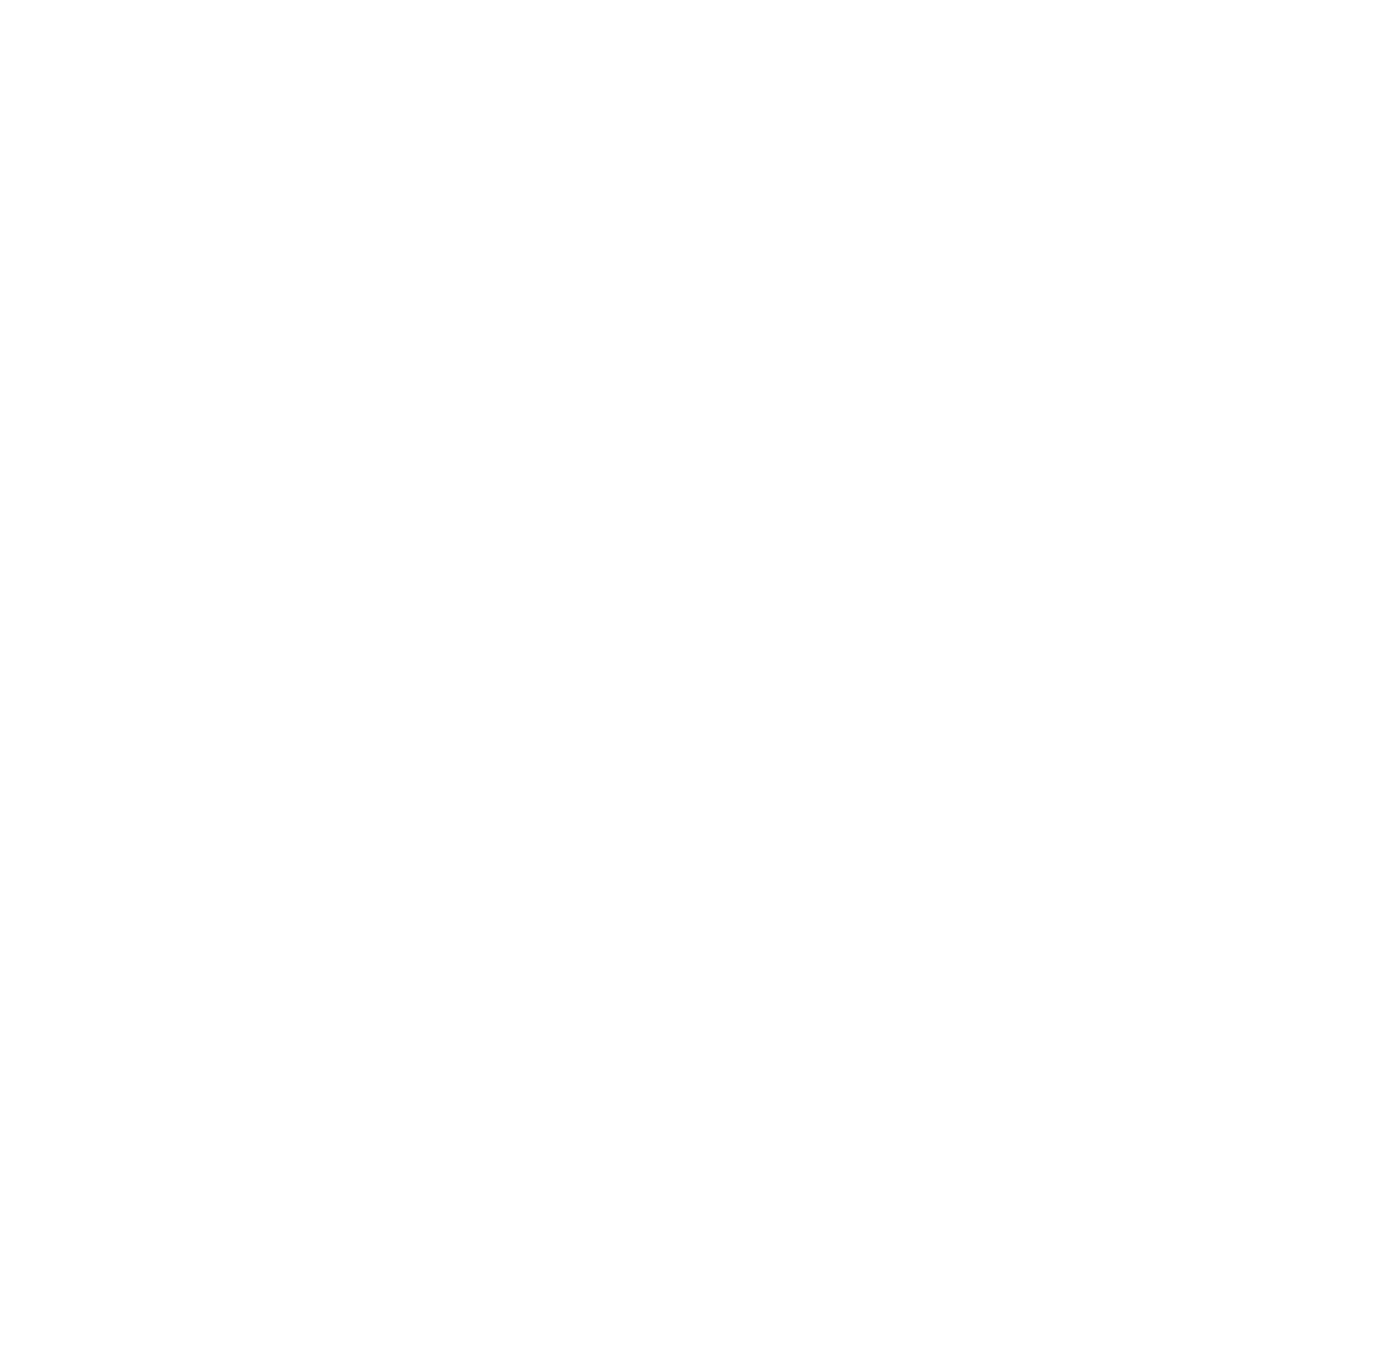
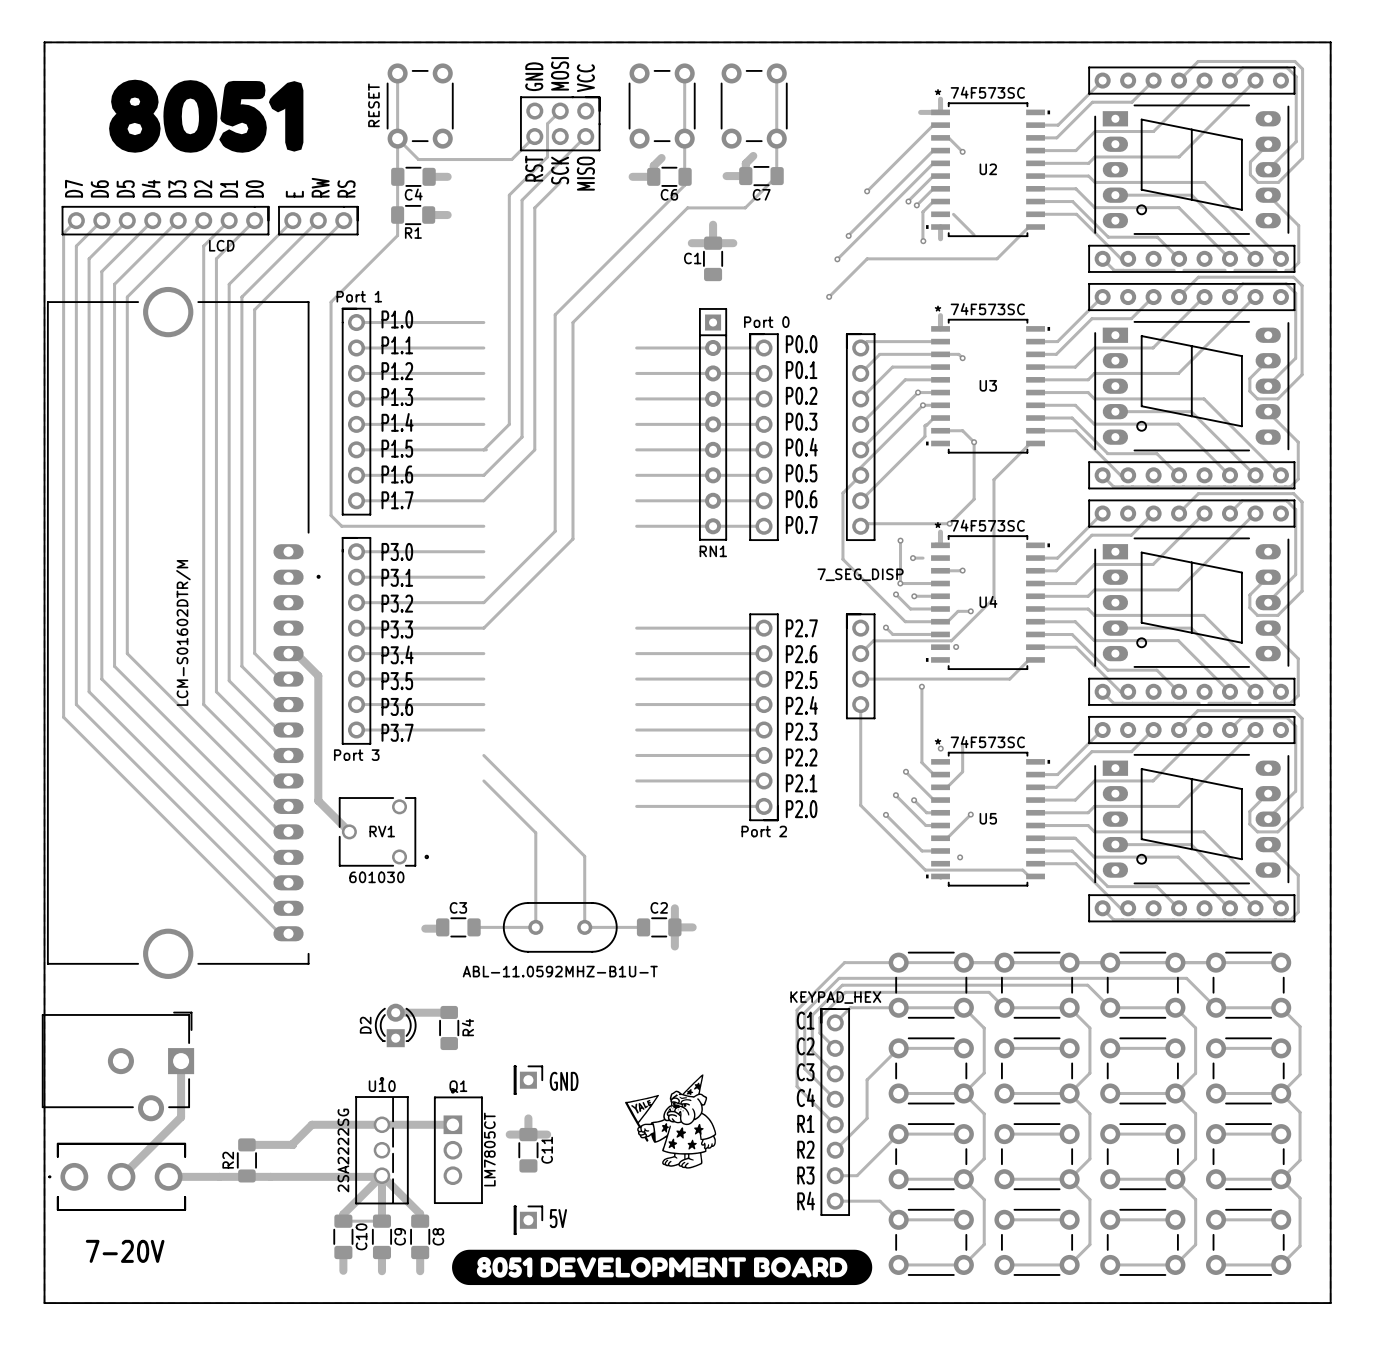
board edge: none -> (44, 42) (1330, 42) (1330, 1303) (44, 1303) (44, 42)
track: none -> (397, 73) (397, 235) (331, 302) (331, 515) (341, 526) (483, 526)
text: none -> MOSI (560, 73)
track: none -> (684, 73) (685, 184) (555, 314) (555, 531) (483, 602) (356, 602)
track: none -> (776, 73) (777, 176) (745, 207) (687, 207) (572, 322) (572, 539) (483, 628) (356, 628)
text: none -> GND (534, 76)
text: none -> VCC (585, 78)
drawing: none -> [109, 79, 304, 153]
track: none -> (1102, 80) (1058, 125) (1035, 125)
track: none -> (1153, 80) (1131, 102) (1092, 102) (1056, 137) (1035, 137)
track: none -> (1179, 80) (1198, 61) (1294, 61) (1302, 69) (1302, 158) (1278, 182) (1258, 182) (1250, 174) (1250, 162) (1268, 144)
part: none -> (1191, 80)
track: none -> (1204, 80) (1153, 131) (1095, 131) (1075, 150) (1035, 150)
track: none -> (1230, 80) (1242, 67) (1287, 67) (1296, 76) (1296, 141) (1268, 169)
track: none -> (1255, 80) (1179, 156) (1095, 156) (1088, 163) (1035, 163)
text: none -> 74F573SC (987, 92)
track: none -> (940, 99) (940, 112) (920, 112)
text: none -> RESET (373, 105)
part: none -> (420, 106)
part: none -> (662, 106)
part: none -> (754, 106)
track: none -> (560, 111) (547, 123) (547, 156) (509, 195) (509, 424) (483, 449)
part: none -> (560, 123)
track: none -> (940, 125) (933, 125) (867, 191)
track: none -> (534, 136) (511, 159) (418, 159) (397, 138)
track: none -> (585, 136) (522, 200) (522, 437) (483, 475) (356, 475)
track: none -> (940, 137) (948, 137) (962, 151)
track: none -> (940, 150) (933, 150) (848, 235)
via: none -> (962, 151)
track: none -> (753, 155) (745, 163) (745, 176) (726, 176)
track: none -> (661, 157) (653, 165) (653, 176) (632, 176)
track: none -> (940, 163) (933, 163) (837, 259)
text: none -> RST (534, 168)
U2: none -> (988, 169)
part: none -> (1191, 169)
text: none -> SCK (560, 170)
text: none -> MISO (585, 173)
C4: none -> (413, 176)
track: none -> (447, 176) (429, 176) (429, 181)
C6: none -> (669, 176)
C7: none -> (761, 176)
track: none -> (940, 176) (933, 176) (908, 201)
track: none -> (1035, 176) (1088, 176) (1095, 182) (1204, 182) (1280, 258)
track: none -> (560, 182) (534, 207) (534, 449) (483, 500) (356, 500)
text: none -> RW (320, 187)
text: none -> D7 (74, 188)
text: none -> D6 (99, 188)
text: none -> D5 (125, 188)
text: none -> D4 (151, 188)
text: none -> D3 (177, 188)
text: none -> D2 (203, 188)
text: none -> D1 (229, 188)
text: none -> D0 (254, 188)
text: none -> RS (346, 188)
track: none -> (940, 188) (933, 188) (916, 205)
track: none -> (1035, 188) (1075, 188) (1094, 207) (1178, 207) (1230, 258)
via: none -> (867, 191)
text: none -> E (294, 194)
track: none -> (1115, 195) (1191, 195) (1255, 258)
track: none -> (1268, 195) (1298, 225) (1298, 262) (1291, 270) (1285, 270)
via: none -> (908, 201)
track: none -> (940, 201) (933, 201) (922, 211) (923, 241)
track: none -> (1035, 201) (1072, 201) (1108, 237) (1157, 237) (1179, 258)
via: none -> (916, 205)
track: none -> (953, 214) (974, 234)
track: none -> (1035, 214) (1076, 214) (1121, 258) (1128, 258)
R1: none -> (413, 215)
track: none -> (428, 215) (447, 215)
track: none -> (76, 220) (63, 233) (63, 717) (280, 933) (288, 933)
track: none -> (101, 220) (76, 246) (76, 704) (280, 908) (288, 908)
track: none -> (127, 220) (89, 258) (89, 691) (280, 882) (288, 882)
track: none -> (152, 220) (101, 271) (101, 679) (280, 857) (288, 857)
part: none -> (165, 220)
track: none -> (178, 220) (114, 284) (114, 666) (280, 831) (288, 831)
track: none -> (203, 220) (127, 297) (127, 653) (280, 806) (288, 806)
track: none -> (229, 220) (203, 246) (203, 704) (280, 780) (288, 780)
track: none -> (254, 220) (216, 258) (216, 691) (280, 755) (288, 755)
track: none -> (292, 220) (229, 284) (229, 680) (278, 730) (288, 730)
track: none -> (318, 220) (241, 297) (241, 666) (280, 704) (288, 704)
part: none -> (318, 220)
track: none -> (343, 220) (254, 309) (254, 653) (280, 679) (288, 679)
track: none -> (713, 224) (713, 243)
track: none -> (940, 227) (940, 238)
track: none -> (1035, 227) (1028, 227) (997, 258) (867, 258) (829, 296)
via: none -> (848, 235)
via: none -> (923, 241)
track: none -> (691, 243) (733, 243)
text: none -> LCD (221, 245)
C1: none -> (713, 258)
track: none -> (1102, 258) (1114, 270) (1123, 270)
part: none -> (1191, 258)
via: none -> (837, 259)
track: none -> (1123, 270) (1132, 270)
track: none -> (1132, 270) (1148, 270)
track: none -> (1148, 270) (1158, 270)
track: none -> (1158, 270) (1174, 270)
track: none -> (1183, 270) (1199, 270)
track: none -> (1199, 270) (1209, 270)
track: none -> (1209, 270) (1225, 270)
track: none -> (1234, 270) (1250, 270)
track: none -> (1250, 270) (1260, 270)
track: none -> (1260, 270) (1276, 270)
track: none -> (1233, 292) (1242, 283) (1286, 283) (1295, 293) (1295, 358) (1267, 386)
text: none -> Port 1 (359, 296)
via: none -> (829, 296)
track: none -> (1178, 297) (1198, 277) (1293, 277) (1302, 285) (1302, 374) (1277, 398) (1257, 398) (1249, 391) (1249, 378) (1267, 360)
part: none -> (1191, 297)
track: none -> (1204, 297) (1153, 347) (1094, 347) (1075, 367) (1035, 367)
track: none -> (1098, 301) (1057, 341) (1035, 341)
track: none -> (1149, 301) (1131, 318) (1091, 318) (1056, 354) (1035, 354)
track: none -> (1251, 301) (1178, 373) (1094, 373) (1088, 379) (1035, 379)
text: none -> 74F573SC (987, 309)
track: none -> (940, 315) (940, 328)
text: none -> P1.0 (397, 319)
track: none -> (356, 322) (483, 322)
text: none -> Port 0 (766, 322)
track: none -> (940, 341) (867, 341) (860, 347)
text: none -> P0.0 (801, 344)
text: none -> P1.1 (397, 345)
track: none -> (356, 347) (483, 347)
track: none -> (636, 347) (764, 347)
track: none -> (962, 358) (958, 354) (879, 354) (860, 373)
via: none -> (962, 358)
track: none -> (940, 367) (892, 367) (860, 398)
text: none -> P0.1 (801, 370)
text: none -> P1.2 (397, 371)
track: none -> (356, 373) (483, 373)
track: none -> (636, 373) (764, 373)
track: none -> (940, 379) (905, 379) (860, 424)
U3: none -> (988, 386)
part: none -> (1191, 386)
track: none -> (918, 392) (860, 449)
track: none -> (918, 392) (940, 392)
via: none -> (918, 392)
track: none -> (1035, 392) (1088, 392) (1094, 398) (1204, 398) (1276, 471)
text: none -> P0.2 (801, 395)
text: none -> P1.3 (397, 396)
track: none -> (356, 398) (483, 398)
track: none -> (636, 398) (764, 398)
via: none -> (922, 405)
track: none -> (940, 405) (922, 405) (860, 467) (860, 475) (842, 493) (842, 559) (905, 621) (947, 621) (958, 611) (970, 611)
track: none -> (1035, 405) (1075, 405) (1094, 424) (1178, 424) (1230, 475)
part: none -> (356, 411)
track: none -> (1114, 411) (1191, 411) (1255, 475)
track: none -> (1267, 411) (1298, 442) (1298, 479) (1290, 486) (1285, 486)
track: none -> (940, 418) (933, 418) (924, 425) (924, 436) (860, 500)
track: none -> (1035, 418) (1072, 418) (1107, 453) (1156, 453) (1174, 471)
text: none -> P0.3 (801, 421)
text: none -> P1.4 (397, 422)
track: none -> (356, 424) (483, 424)
track: none -> (636, 424) (764, 424)
RN1: none -> (713, 424)
track: none -> (940, 430) (962, 430) (974, 442) (974, 499) (949, 523) (868, 523) (865, 526) (860, 526)
track: none -> (1035, 430) (1076, 430) (1120, 475) (1128, 475)
part: none -> (764, 437)
part: none -> (860, 437)
via: none -> (974, 442)
track: none -> (1035, 443) (1030, 443) (993, 479) (993, 598) (951, 640) (873, 640) (860, 653)
text: none -> P0.4 (801, 447)
text: none -> P1.5 (397, 448)
track: none -> (356, 449) (486, 449)
track: none -> (636, 449) (764, 449)
text: none -> P0.5 (801, 473)
text: none -> P1.6 (397, 474)
track: none -> (636, 475) (764, 475)
track: none -> (1102, 475) (1113, 486) (1122, 486)
part: none -> (1191, 475)
track: none -> (1122, 486) (1132, 486)
track: none -> (1132, 486) (1148, 486)
track: none -> (1148, 486) (1157, 486)
track: none -> (1157, 486) (1173, 486)
track: none -> (1173, 486) (1183, 486)
track: none -> (1183, 486) (1199, 486)
track: none -> (1199, 486) (1208, 486)
track: none -> (1208, 486) (1224, 486)
track: none -> (1224, 486) (1234, 486)
track: none -> (1234, 486) (1250, 486)
track: none -> (1250, 486) (1259, 486)
track: none -> (1259, 486) (1275, 486)
track: none -> (1275, 486) (1285, 486)
text: none -> P0.6 (801, 499)
text: none -> P1.7 (397, 500)
track: none -> (636, 500) (764, 500)
track: none -> (1102, 513) (1057, 558) (1035, 558)
track: none -> (1178, 513) (1198, 493) (1293, 493) (1302, 502) (1302, 591) (1277, 615) (1257, 615) (1249, 607) (1249, 595) (1268, 577)
part: none -> (1191, 513)
track: none -> (1204, 513) (1153, 564) (1094, 564) (1075, 583) (1035, 583)
track: none -> (1229, 513) (1242, 500) (1286, 500) (1295, 509) (1295, 574) (1267, 602)
track: none -> (1255, 513) (1178, 589) (1094, 589) (1088, 596) (1035, 596)
track: none -> (1149, 517) (1131, 535) (1091, 535) (1056, 570) (1035, 570)
via: none -> (949, 523)
text: none -> P0.7 (801, 525)
text: none -> 74F573SC (987, 525)
track: none -> (636, 526) (764, 526)
track: none -> (940, 532) (940, 545)
track: none -> (900, 540) (900, 583) (902, 583)
via: none -> (900, 540)
track: none -> (356, 551) (483, 551)
text: none -> P3.0 (397, 551)
track: none -> (912, 558) (923, 558)
via: none -> (912, 558)
track: none -> (962, 570) (940, 570)
via: none -> (962, 570)
text: none -> 7_SEG_DISP (860, 574)
track: none -> (356, 577) (483, 577)
text: none -> P3.1 (397, 577)
via: none -> (900, 583)
track: none -> (903, 583) (940, 583)
track: none -> (896, 594) (910, 608) (940, 608)
via: none -> (896, 594)
track: none -> (914, 596) (940, 596)
via: none -> (914, 596)
U4: none -> (987, 602)
part: none -> (1191, 602)
text: none -> P3.2 (397, 603)
track: none -> (1035, 609) (1088, 609) (1094, 615) (1204, 615) (1276, 687)
via: none -> (970, 611)
track: none -> (1035, 621) (1075, 621) (1094, 640) (1178, 640) (1230, 691)
track: none -> (885, 627) (892, 634) (940, 634)
via: none -> (885, 627)
track: none -> (636, 628) (764, 628)
text: none -> P2.7 (801, 628)
track: none -> (1114, 628) (1191, 628) (1250, 687)
track: none -> (1267, 628) (1298, 658) (1298, 695) (1290, 703) (1285, 703)
text: none -> P3.3 (397, 629)
part: none -> (183, 632)
text: none -> LCM-S01602DTR/M (183, 632)
track: none -> (1035, 634) (1072, 634) (1107, 670) (1156, 670) (1174, 687)
part: none -> (356, 640)
via: none -> (956, 646)
track: none -> (1035, 647) (1076, 647) (1120, 691) (1128, 691)
track: none -> (288, 653) (296, 653) (318, 675) (318, 800) (349, 831)
track: none -> (356, 653) (483, 653)
track: none -> (636, 653) (764, 653)
text: none -> P3.4 (397, 654)
text: none -> P2.6 (801, 654)
track: none -> (1035, 659) (1028, 659) (1009, 679) (860, 679)
part: none -> (860, 666)
track: none -> (356, 679) (483, 679)
track: none -> (636, 679) (764, 679)
text: none -> P2.5 (801, 680)
text: none -> P3.5 (397, 681)
track: none -> (921, 686) (921, 762) (933, 774) (940, 774)
via: none -> (921, 686)
part: none -> (1191, 691)
track: none -> (1102, 692) (1113, 703) (1122, 703)
track: none -> (1122, 703) (1132, 703)
track: none -> (1132, 703) (1148, 703)
track: none -> (1148, 703) (1157, 703)
track: none -> (1157, 703) (1173, 703)
track: none -> (1173, 703) (1183, 703)
track: none -> (1183, 703) (1199, 703)
track: none -> (1208, 703) (1224, 703)
track: none -> (1224, 703) (1234, 703)
track: none -> (1234, 703) (1250, 703)
track: none -> (1259, 703) (1275, 703)
track: none -> (1275, 703) (1285, 703)
track: none -> (356, 704) (483, 704)
track: none -> (636, 704) (764, 704)
track: none -> (860, 704) (860, 805) (925, 870) (1022, 870) (1029, 876) (1035, 876)
text: none -> P2.4 (801, 705)
text: none -> P3.6 (397, 706)
part: none -> (764, 717)
track: none -> (1182, 725) (1197, 710) (1294, 710) (1302, 718) (1302, 807) (1277, 831) (1257, 831) (1249, 824) (1249, 811) (1268, 793)
track: none -> (356, 730) (483, 730)
track: none -> (636, 730) (764, 730)
track: none -> (1153, 730) (1131, 751) (1091, 751) (1056, 787) (1035, 787)
part: none -> (1191, 730)
track: none -> (1229, 730) (1241, 717) (1287, 717) (1295, 726) (1295, 791) (1267, 819)
text: none -> P2.3 (801, 731)
text: none -> P3.7 (397, 732)
track: none -> (1098, 733) (1057, 774) (1035, 774)
track: none -> (1200, 733) (1153, 780) (1094, 780) (1075, 800) (1035, 800)
track: none -> (1251, 733) (1178, 806) (1094, 806) (1088, 812) (1035, 812)
text: none -> 74F573SC (987, 742)
track: none -> (962, 745) (962, 771) (947, 787) (940, 787)
via: none -> (940, 748)
text: none -> Port 3 (356, 755)
track: none -> (483, 755) (584, 856) (584, 927) (643, 927)
track: none -> (636, 755) (764, 755)
text: none -> P2.2 (801, 757)
track: none -> (905, 771) (933, 800) (940, 800)
via: none -> (905, 771)
track: none -> (483, 780) (535, 832) (535, 927) (474, 927)
track: none -> (636, 780) (764, 780)
text: none -> P2.1 (801, 783)
track: none -> (895, 795) (925, 825) (940, 825)
via: none -> (895, 795)
track: none -> (914, 800) (926, 812) (940, 812)
via: none -> (914, 800)
track: none -> (636, 806) (764, 806)
text: none -> P2.0 (801, 809)
track: none -> (885, 814) (922, 850) (940, 850)
via: none -> (885, 814)
track: none -> (970, 814) (947, 838) (940, 838)
via: none -> (970, 814)
U5: none -> (988, 819)
part: none -> (1191, 819)
track: none -> (1035, 825) (1088, 825) (1094, 831) (1204, 831) (1280, 908)
RV1: none -> (383, 831)
text: none -> Port 2 (764, 831)
track: none -> (1035, 838) (1075, 838) (1094, 857) (1178, 857) (1230, 908)
track: none -> (1114, 844) (1191, 844) (1254, 908)
track: none -> (1267, 844) (1298, 875) (1298, 912) (1290, 919) (1285, 919)
track: none -> (1035, 850) (1072, 850) (1107, 886) (1156, 886) (1179, 908)
via: none -> (960, 857)
track: none -> (1035, 863) (1076, 863) (1120, 908) (1128, 908)
text: none -> 601030 (376, 877)
track: none -> (674, 908) (674, 946)
track: none -> (1102, 908) (1113, 919) (1122, 919)
part: none -> (1191, 908)
track: none -> (1122, 919) (1132, 919)
track: none -> (1132, 919) (1148, 919)
track: none -> (1148, 919) (1157, 919)
track: none -> (1157, 919) (1173, 919)
track: none -> (1173, 919) (1183, 919)
track: none -> (1183, 919) (1199, 919)
track: none -> (1199, 919) (1208, 919)
track: none -> (1208, 919) (1224, 919)
track: none -> (1224, 919) (1234, 919)
track: none -> (1234, 919) (1250, 919)
track: none -> (1250, 919) (1259, 919)
track: none -> (1259, 919) (1275, 919)
track: none -> (1275, 919) (1285, 919)
track: none -> (442, 927) (425, 928)
C3: none -> (458, 927)
part: none -> (560, 927)
C2: none -> (659, 927)
track: none -> (674, 927) (692, 927)
track: none -> (1281, 962) (844, 962) (797, 1010) (797, 1086) (835, 1124)
text: none -> ABL-11.0592MHZ-B1U-T (560, 971)
part: none -> (931, 985)
part: none -> (1037, 985)
part: none -> (1142, 985)
part: none -> (1248, 985)
text: none -> KEYPAD_HEX (835, 997)
track: none -> (449, 1012) (395, 1012)
text: none -> C1 (805, 1020)
track: none -> (835, 1022) (850, 1007) (963, 1007) (984, 1028) (984, 1073) (963, 1093)
D2: none -> (395, 1025)
R4: none -> (449, 1027)
text: none -> C2 (805, 1046)
track: none -> (835, 1048) (819, 1033) (819, 1017) (845, 992) (989, 992) (1004, 1007) (1069, 1007) (1089, 1028) (1089, 1073) (1069, 1093)
track: none -> (963, 1048) (898, 1048) (867, 1079) (867, 1118) (835, 1150)
track: none -> (1004, 1048) (1069, 1048)
track: none -> (1110, 1048) (1175, 1048)
track: none -> (1216, 1048) (1281, 1048)
track: none -> (181, 1061) (181, 1117) (121, 1176)
part: none -> (118, 1066)
part: none -> (931, 1070)
part: none -> (1037, 1070)
part: none -> (1142, 1070)
part: none -> (1248, 1070)
text: none -> C3 (805, 1072)
track: none -> (835, 1073) (812, 1050) (812, 1015) (842, 985) (1087, 985) (1110, 1007) (1175, 1007) (1195, 1027) (1195, 1073) (1175, 1093)
drawing: none -> [625, 1074, 717, 1169]
part: none -> (528, 1080)
text: none -> GND (564, 1081)
track: none -> (898, 1093) (963, 1093)
track: none -> (963, 1093) (984, 1113) (984, 1158) (963, 1179)
track: none -> (1004, 1093) (1069, 1093)
track: none -> (1069, 1093) (1089, 1113) (1089, 1158) (1069, 1179)
track: none -> (1110, 1093) (1175, 1093)
track: none -> (1175, 1093) (1195, 1113) (1195, 1159) (1175, 1179)
track: none -> (1216, 1093) (1281, 1093)
track: none -> (1281, 1093) (1300, 1074) (1300, 1026) (1281, 1007) (1216, 1007) (1186, 978) (839, 978) (804, 1012) (804, 1068) (835, 1099)
track: none -> (1281, 1093) (1300, 1112) (1300, 1160) (1281, 1179)
text: none -> C4 (805, 1097)
part: none -> (835, 1112)
track: none -> (528, 1118) (528, 1134)
text: none -> R1 (805, 1123)
track: none -> (452, 1124) (311, 1124) (292, 1145) (246, 1144)
track: none -> (509, 1134) (547, 1134)
track: none -> (963, 1134) (898, 1134) (857, 1175) (835, 1175)
track: none -> (1004, 1134) (1069, 1134)
track: none -> (1110, 1134) (1175, 1134)
track: none -> (1216, 1134) (1281, 1134)
U10: none -> (381, 1140)
Q1: none -> (458, 1146)
text: none -> LM7805CT (489, 1149)
text: none -> R2 (805, 1149)
text: none -> 2SA2222SG (343, 1150)
C11: none -> (528, 1150)
part: none -> (931, 1156)
part: none -> (1037, 1156)
part: none -> (1142, 1156)
part: none -> (1248, 1156)
R2: none -> (246, 1160)
track: none -> (381, 1175) (420, 1213) (420, 1221)
track: none -> (381, 1175) (381, 1221) (343, 1221) (343, 1214) (381, 1175)
text: none -> R3 (805, 1175)
part: none -> (116, 1176)
track: none -> (168, 1176) (380, 1176)
track: none -> (898, 1179) (963, 1179)
track: none -> (963, 1179) (984, 1199) (984, 1244) (963, 1264) (898, 1264)
track: none -> (1004, 1179) (1069, 1179)
track: none -> (1069, 1179) (1089, 1199) (1089, 1244) (1069, 1264) (1004, 1264)
track: none -> (1110, 1179) (1175, 1179)
track: none -> (1175, 1179) (1195, 1199) (1195, 1244) (1175, 1264) (1110, 1264)
track: none -> (1216, 1179) (1281, 1179)
track: none -> (1281, 1179) (1300, 1198) (1300, 1246) (1281, 1264) (1216, 1264)
text: none -> R4 (806, 1201)
track: none -> (835, 1201) (880, 1201) (898, 1219) (963, 1219)
text: none -> 5V (558, 1218)
track: none -> (1004, 1219) (1069, 1219)
track: none -> (1110, 1219) (1175, 1219)
track: none -> (1216, 1219) (1281, 1219)
part: none -> (528, 1220)
C10: none -> (343, 1236)
C9: none -> (381, 1236)
C8: none -> (420, 1236)
part: none -> (931, 1242)
part: none -> (1037, 1242)
part: none -> (1142, 1242)
part: none -> (1248, 1242)
drawing: none -> [452, 1249, 873, 1286]
text: none -> 7-20V (125, 1251)
track: none -> (343, 1252) (343, 1270)
track: none -> (381, 1252) (381, 1271)
track: none -> (420, 1252) (420, 1271)

